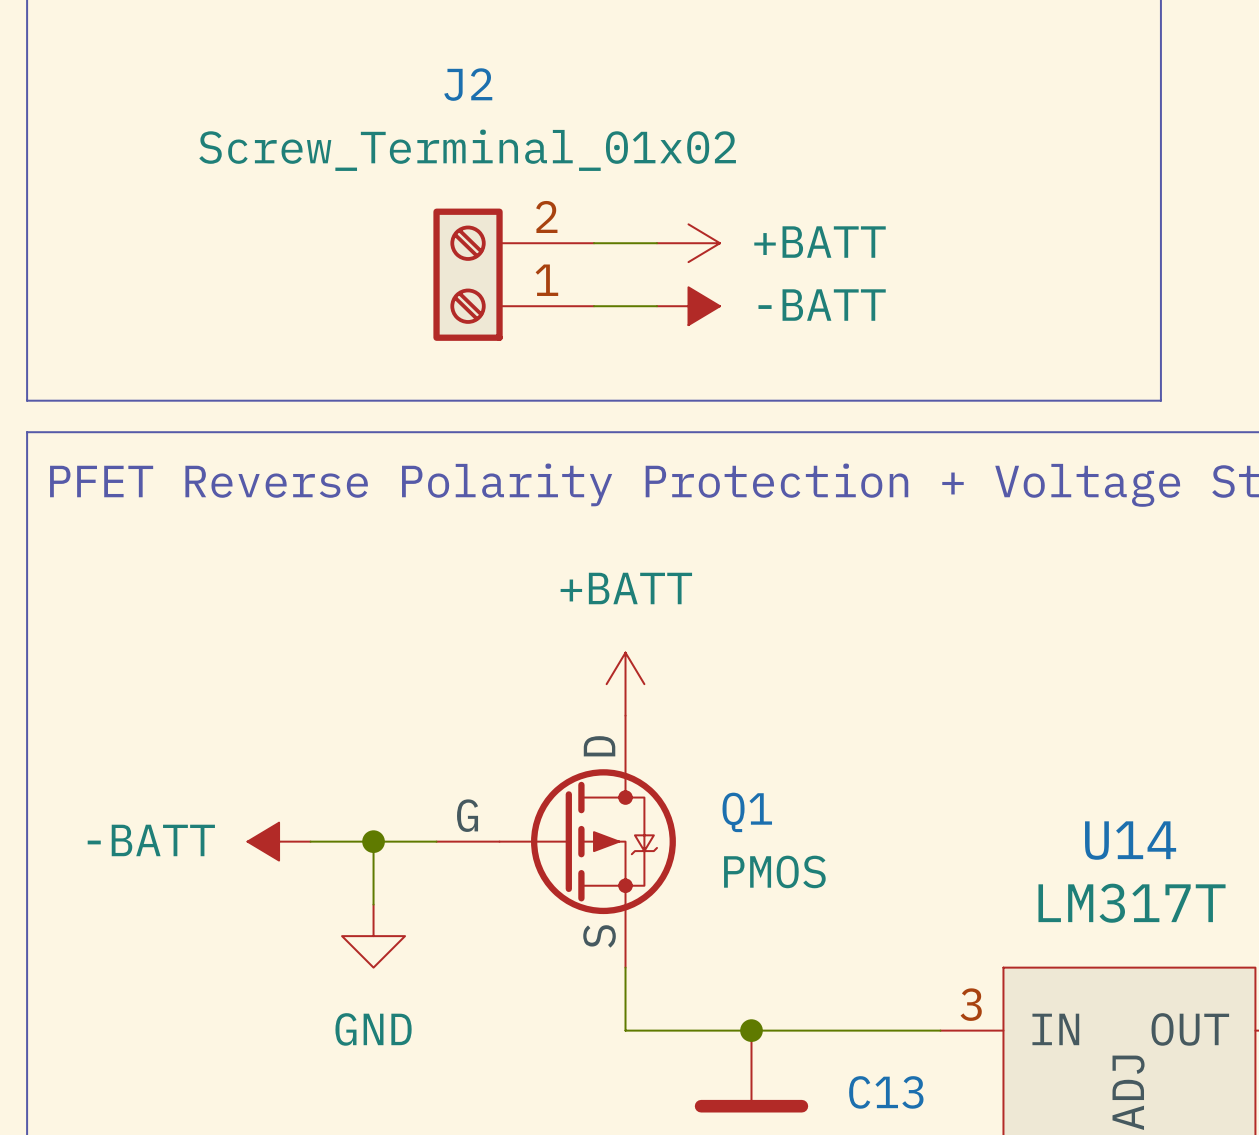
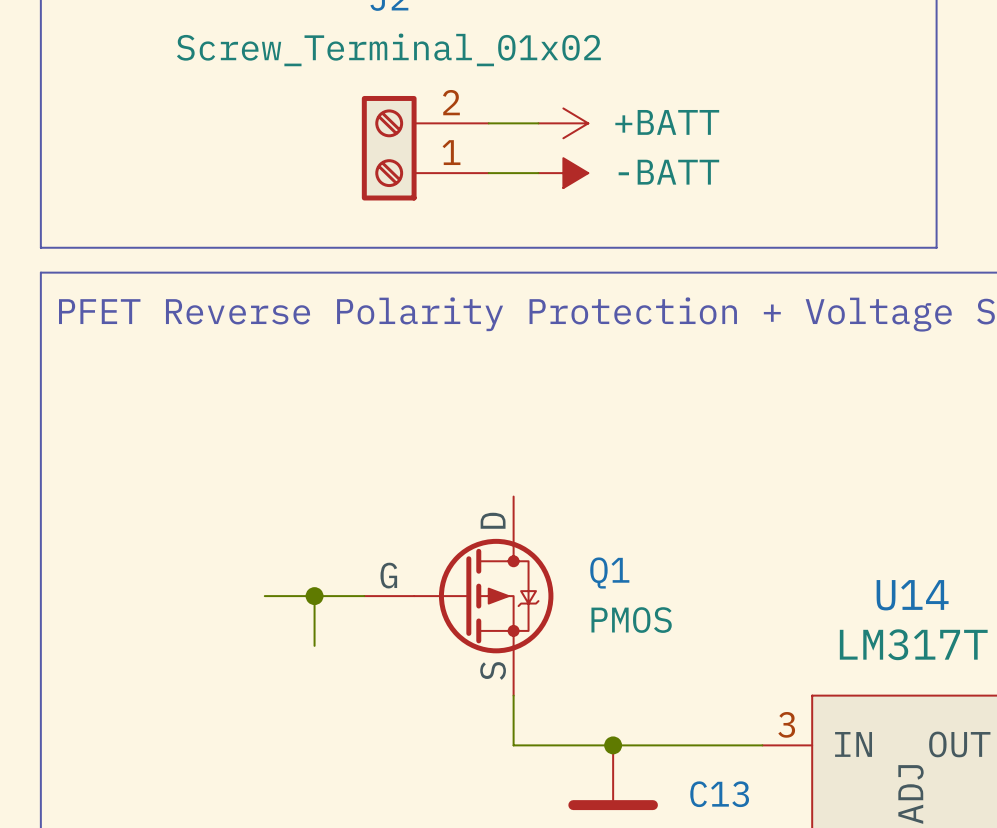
power symbol: +BATT (625, 684) -> none
power symbol: -BATT (279, 841) -> none
power symbol: GND (373, 936) -> none

